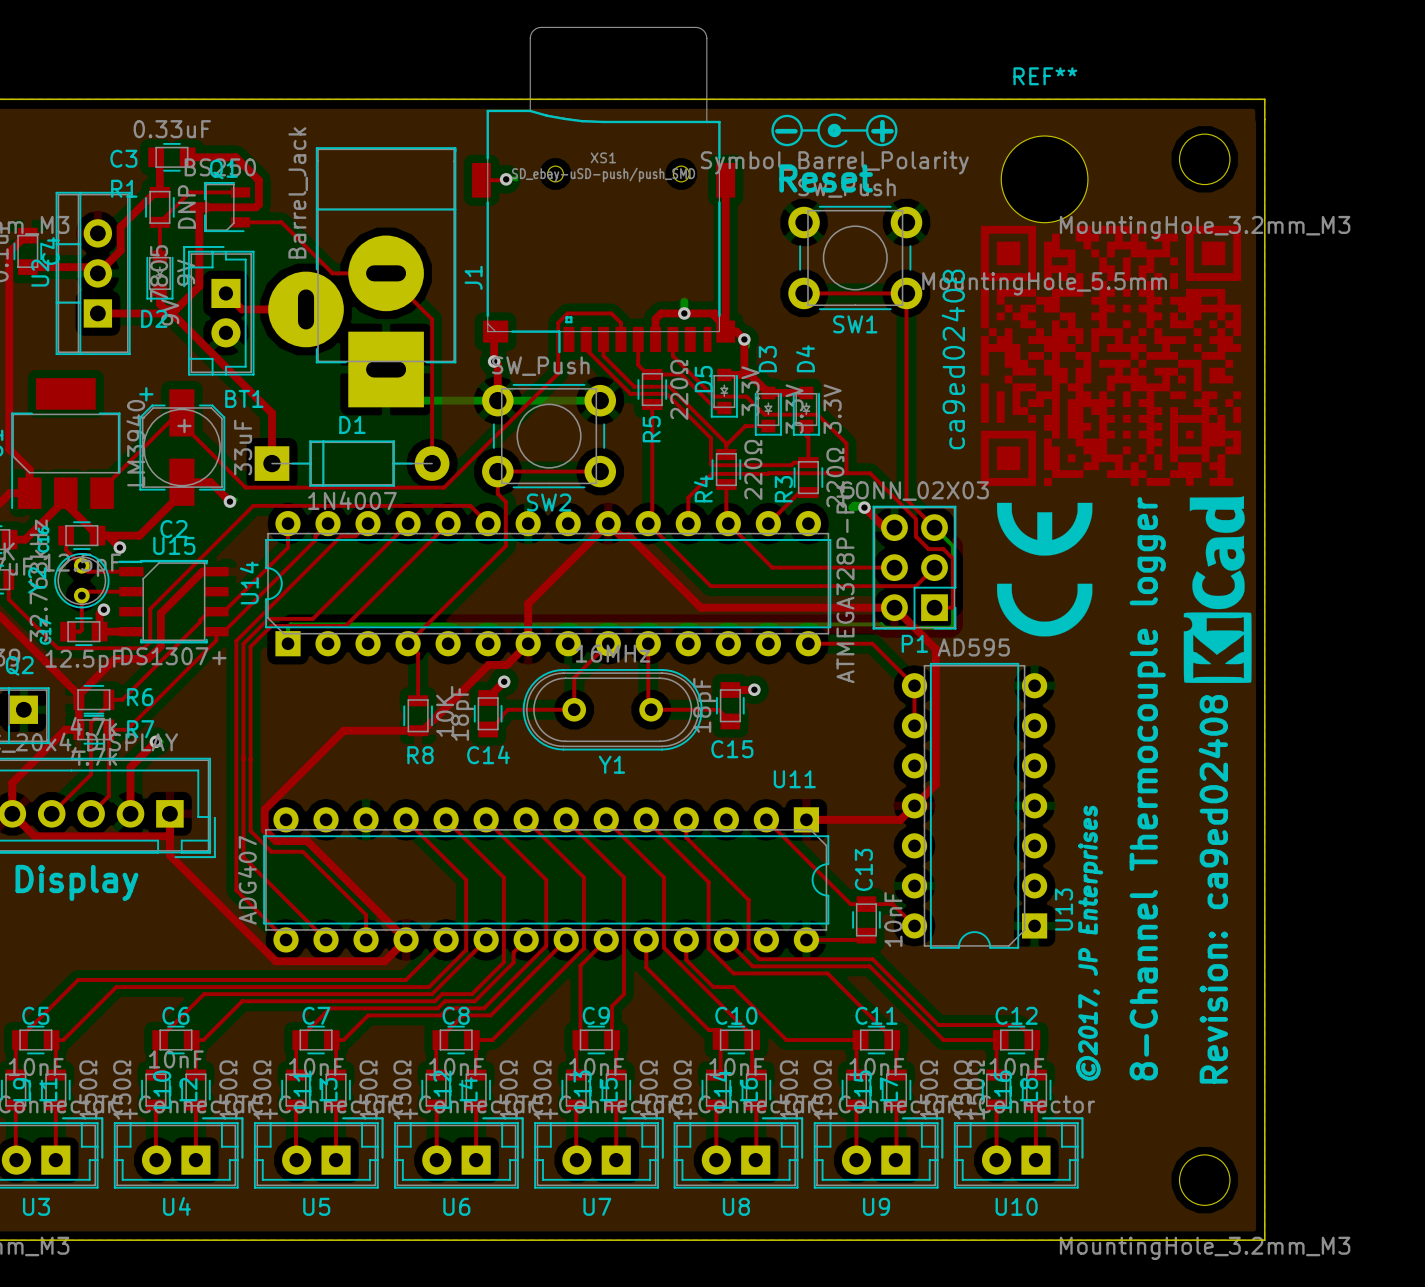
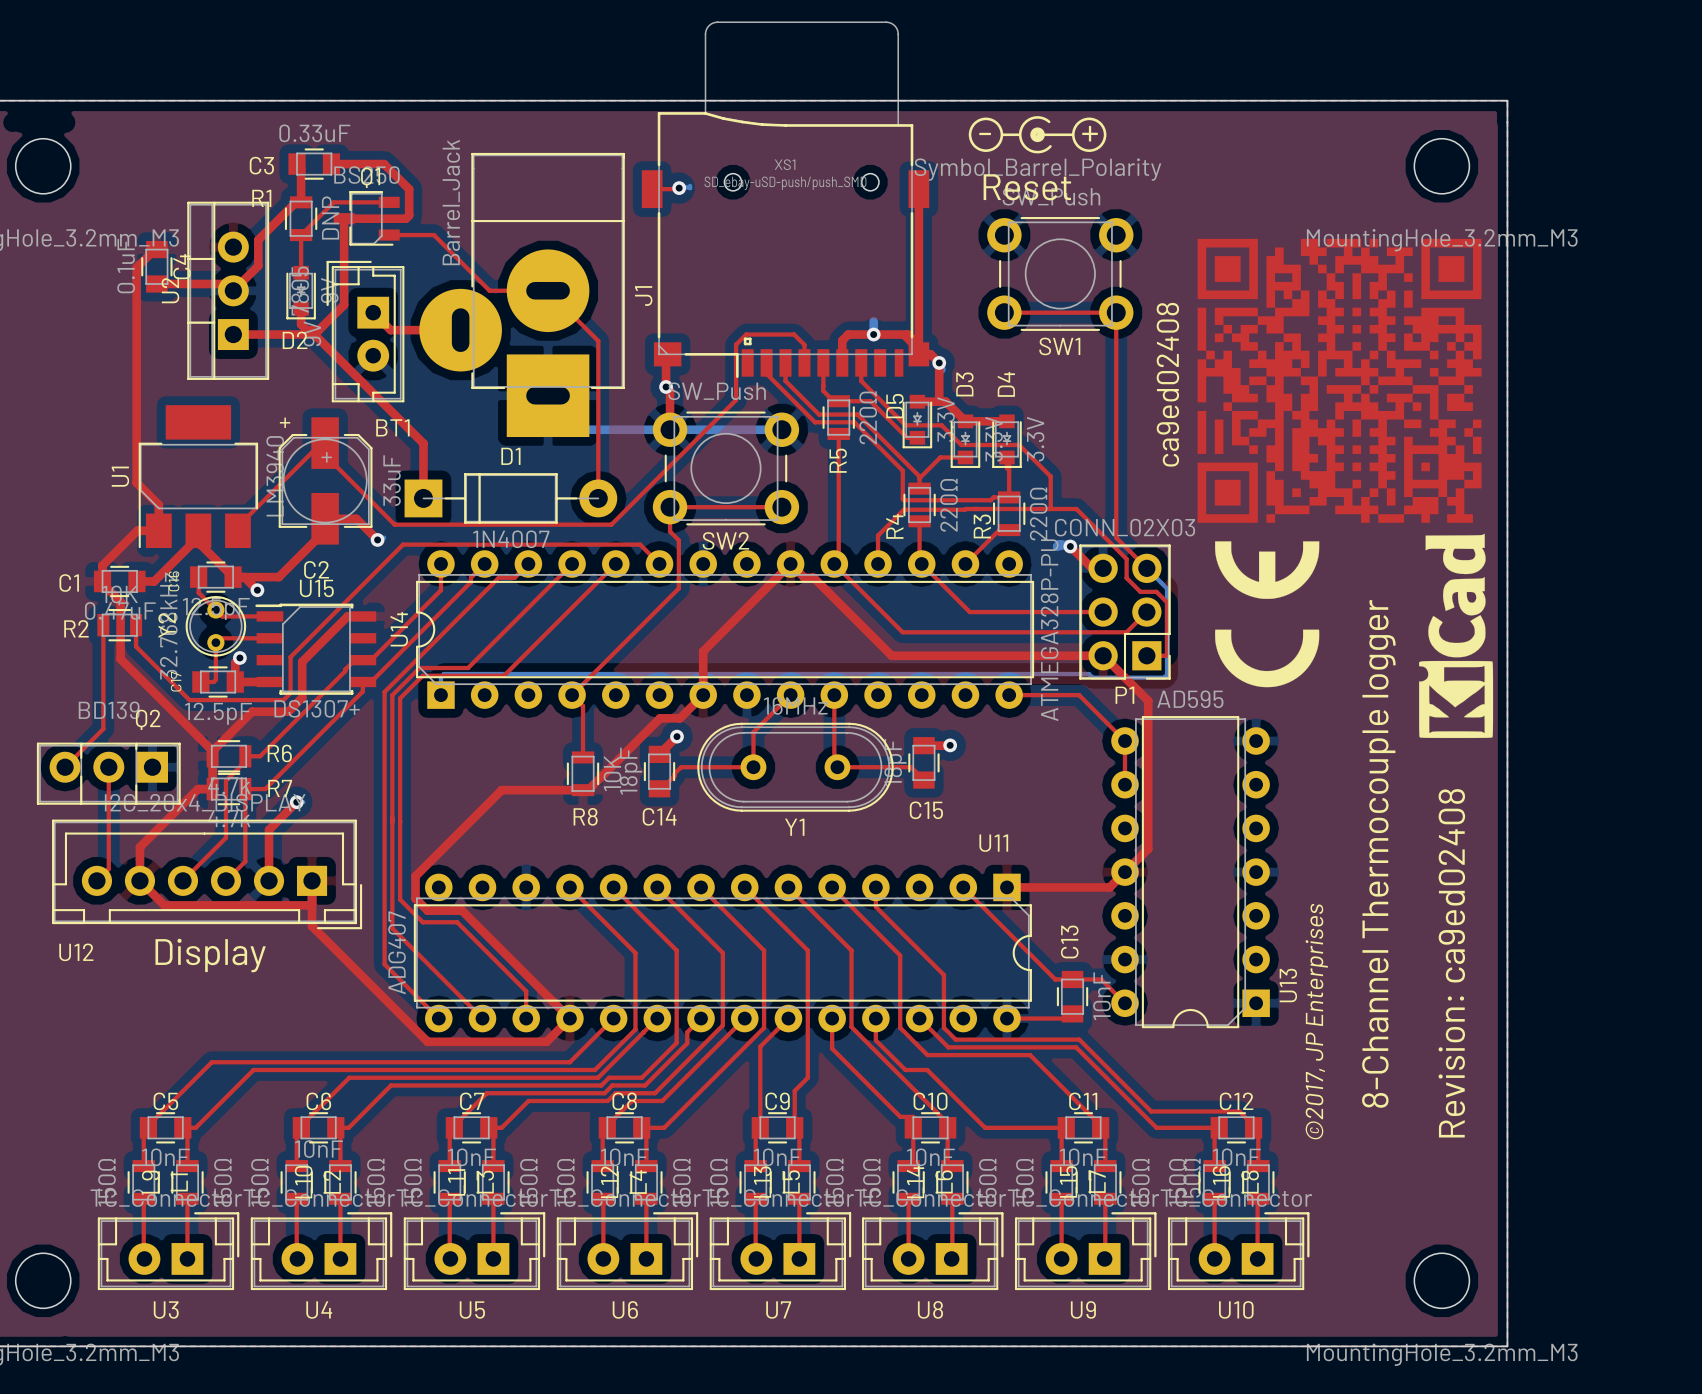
REF**: MountingHole_5.5mm (1044, 179) -> none

